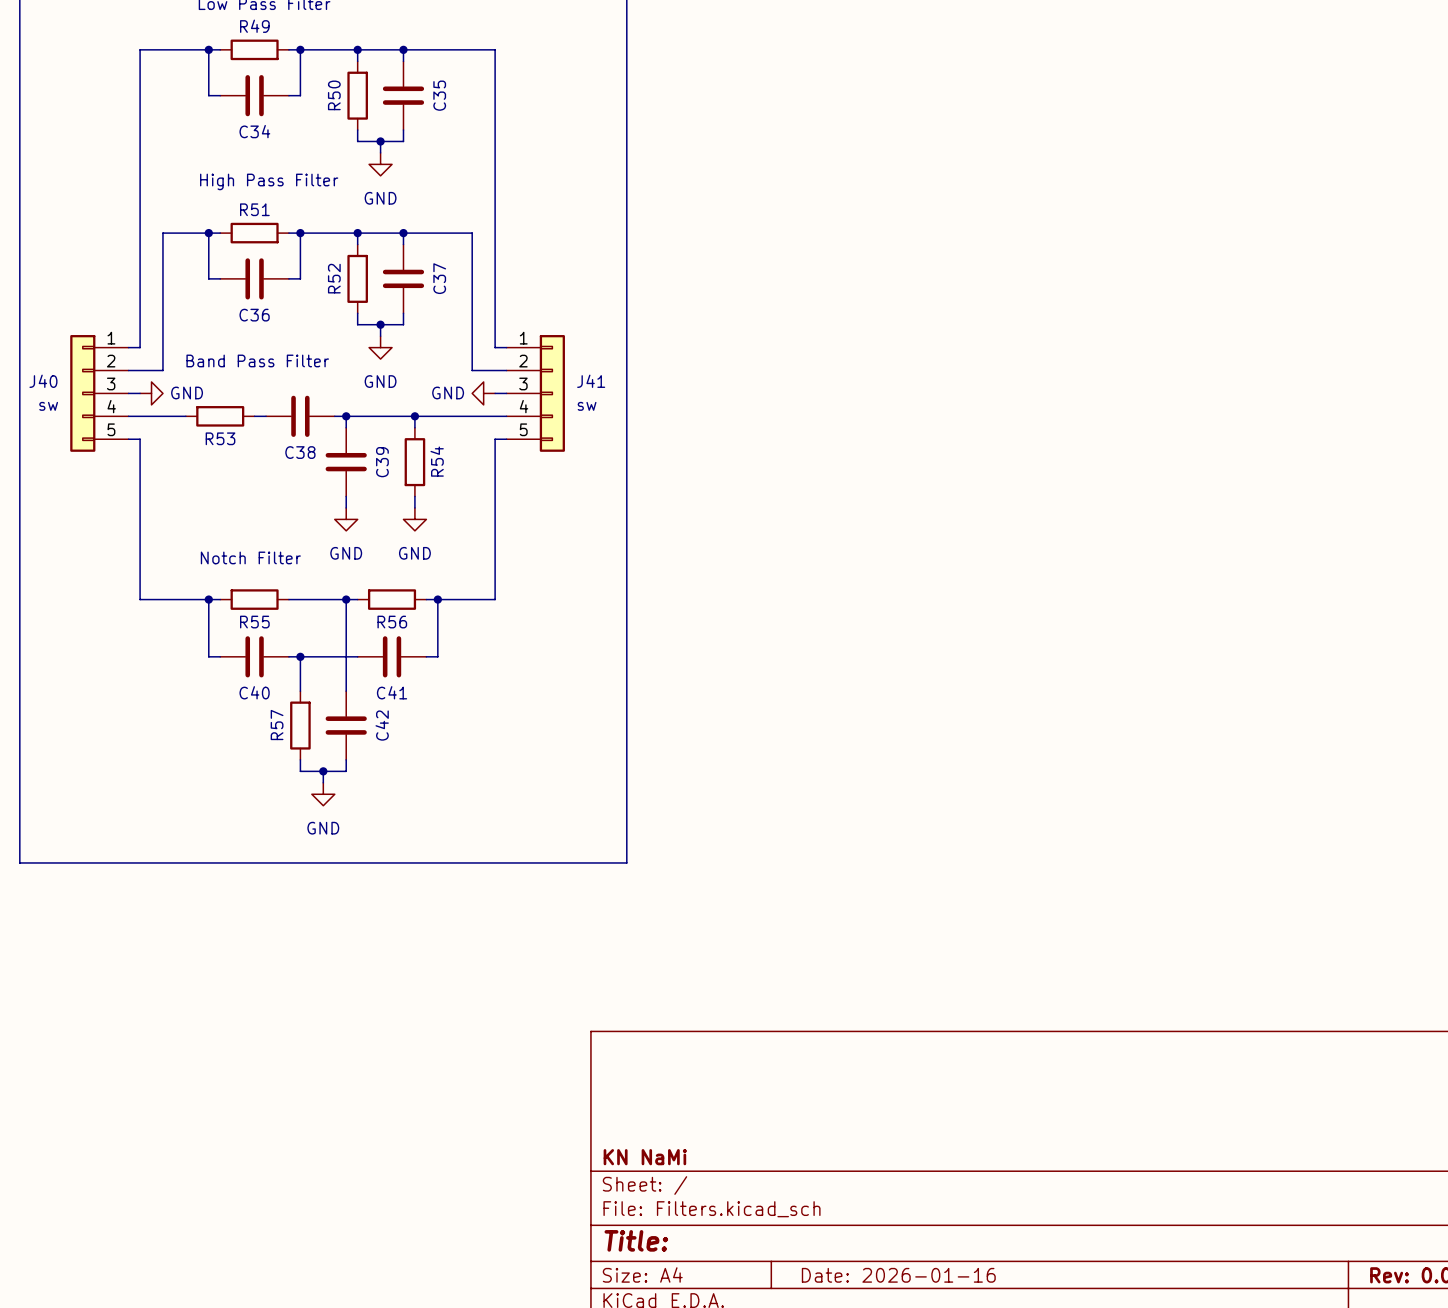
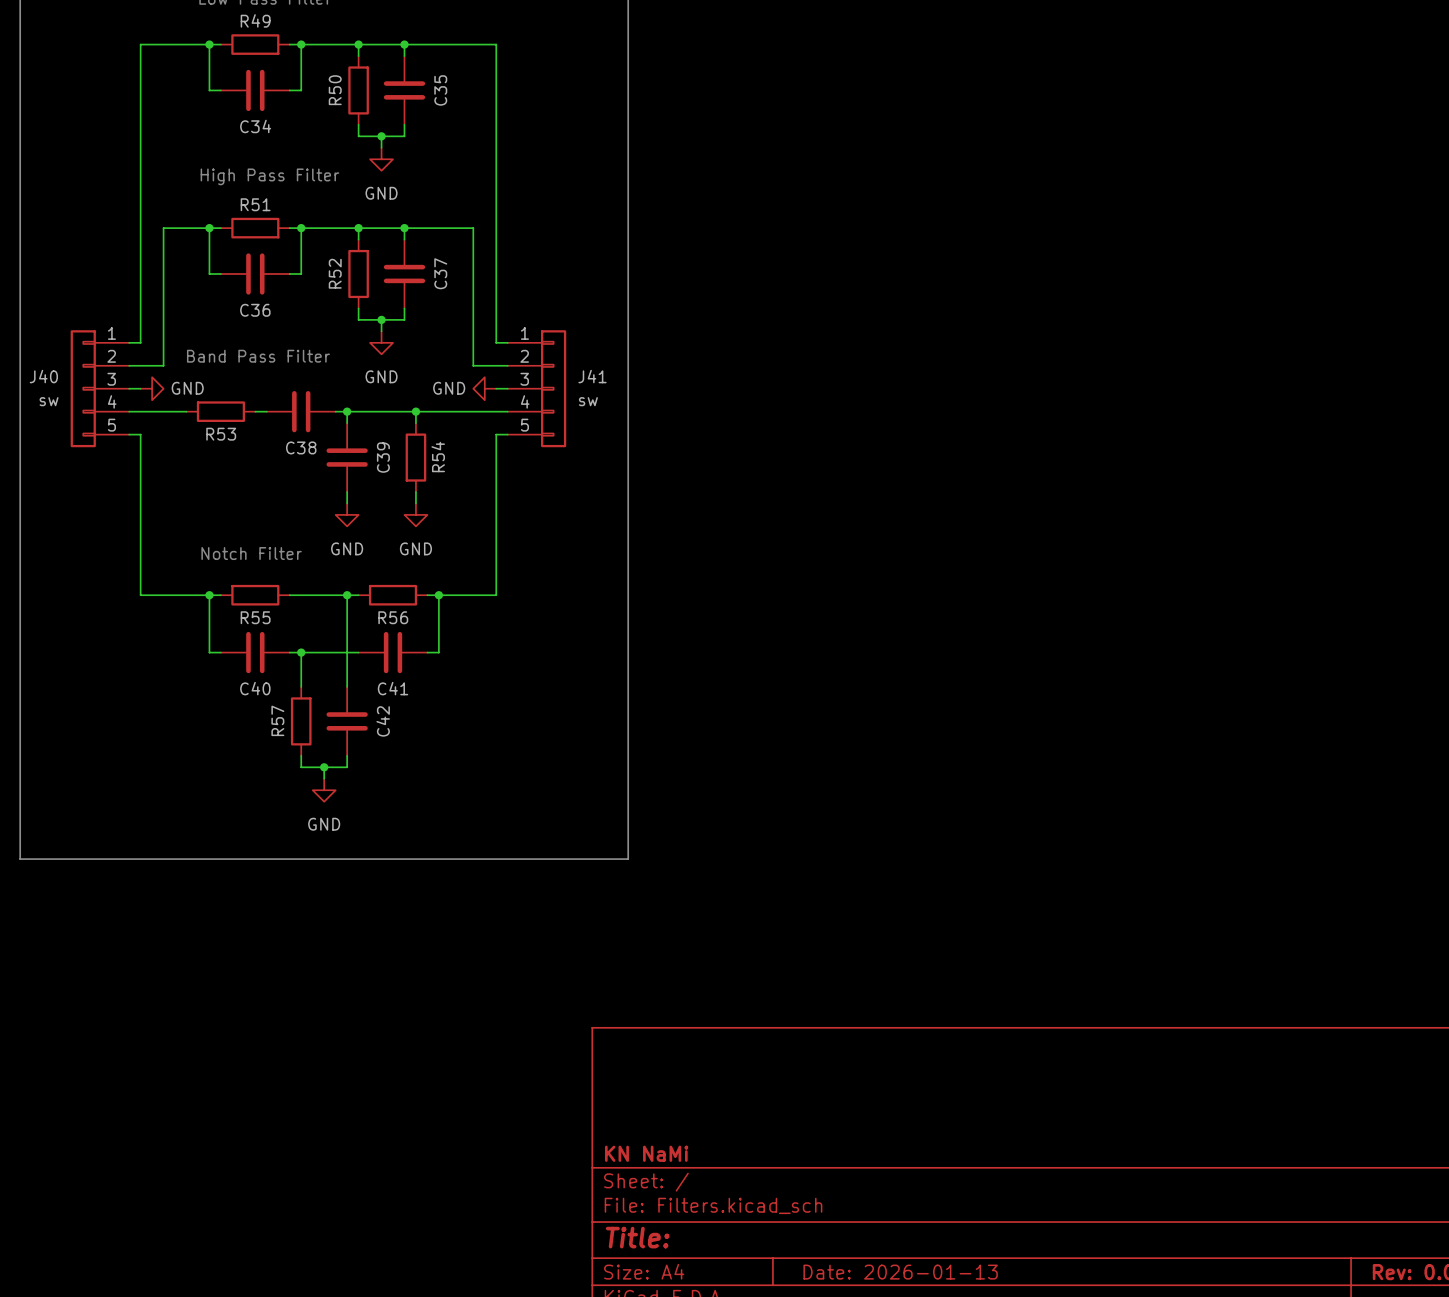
title block: Date: 2026-01-16 (898, 1275) -> Date: 2026-01-13 (900, 1272)

